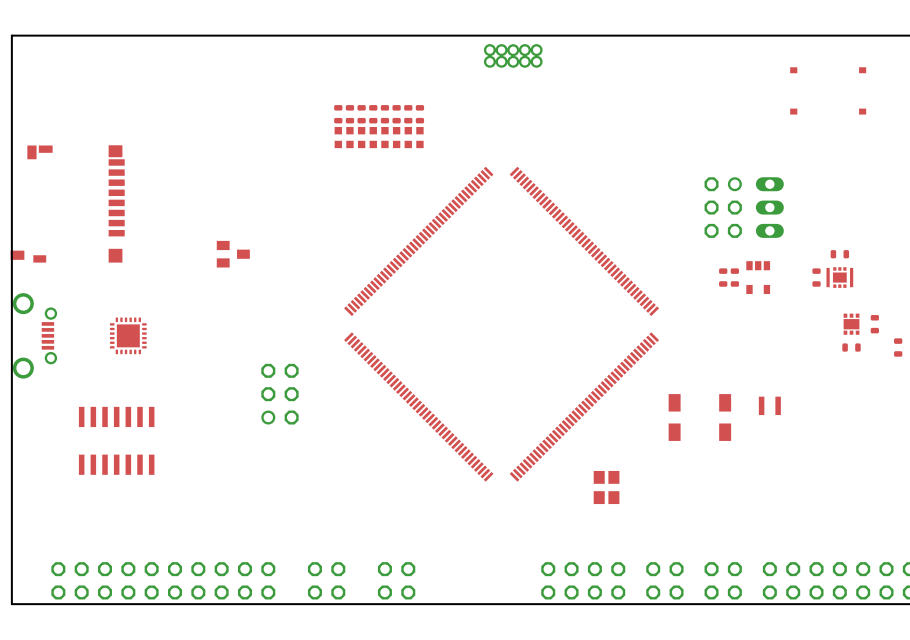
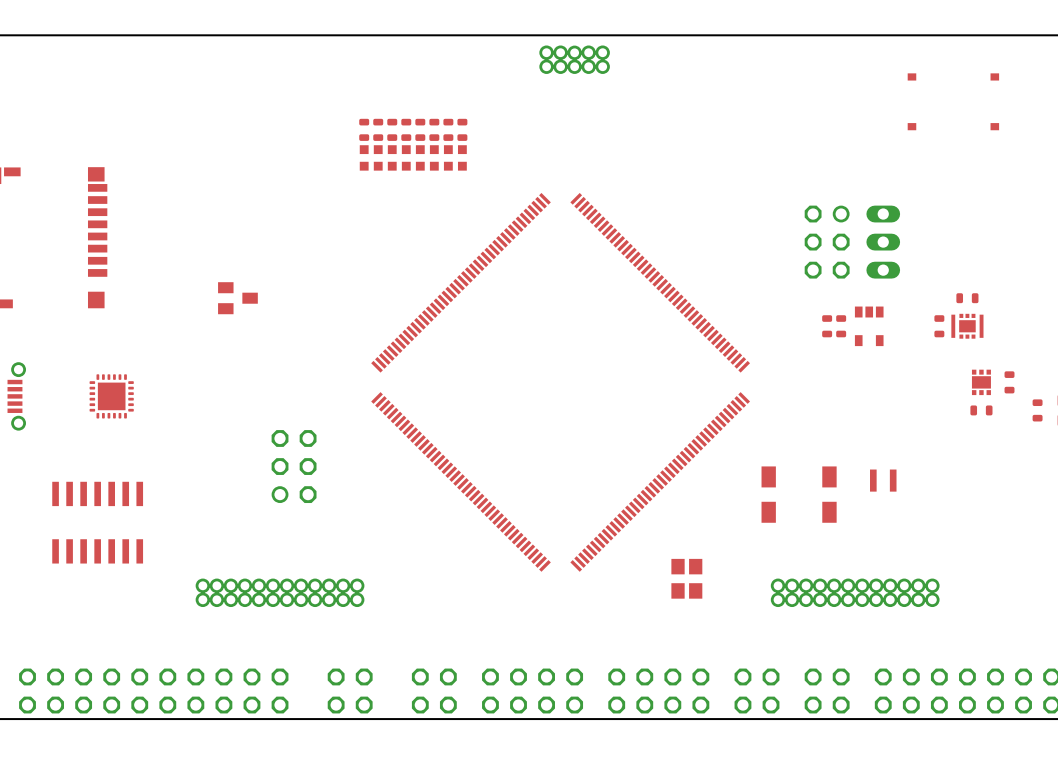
part: none -> (280, 592)
part: none -> (855, 592)
part: none -> (532, 691)

